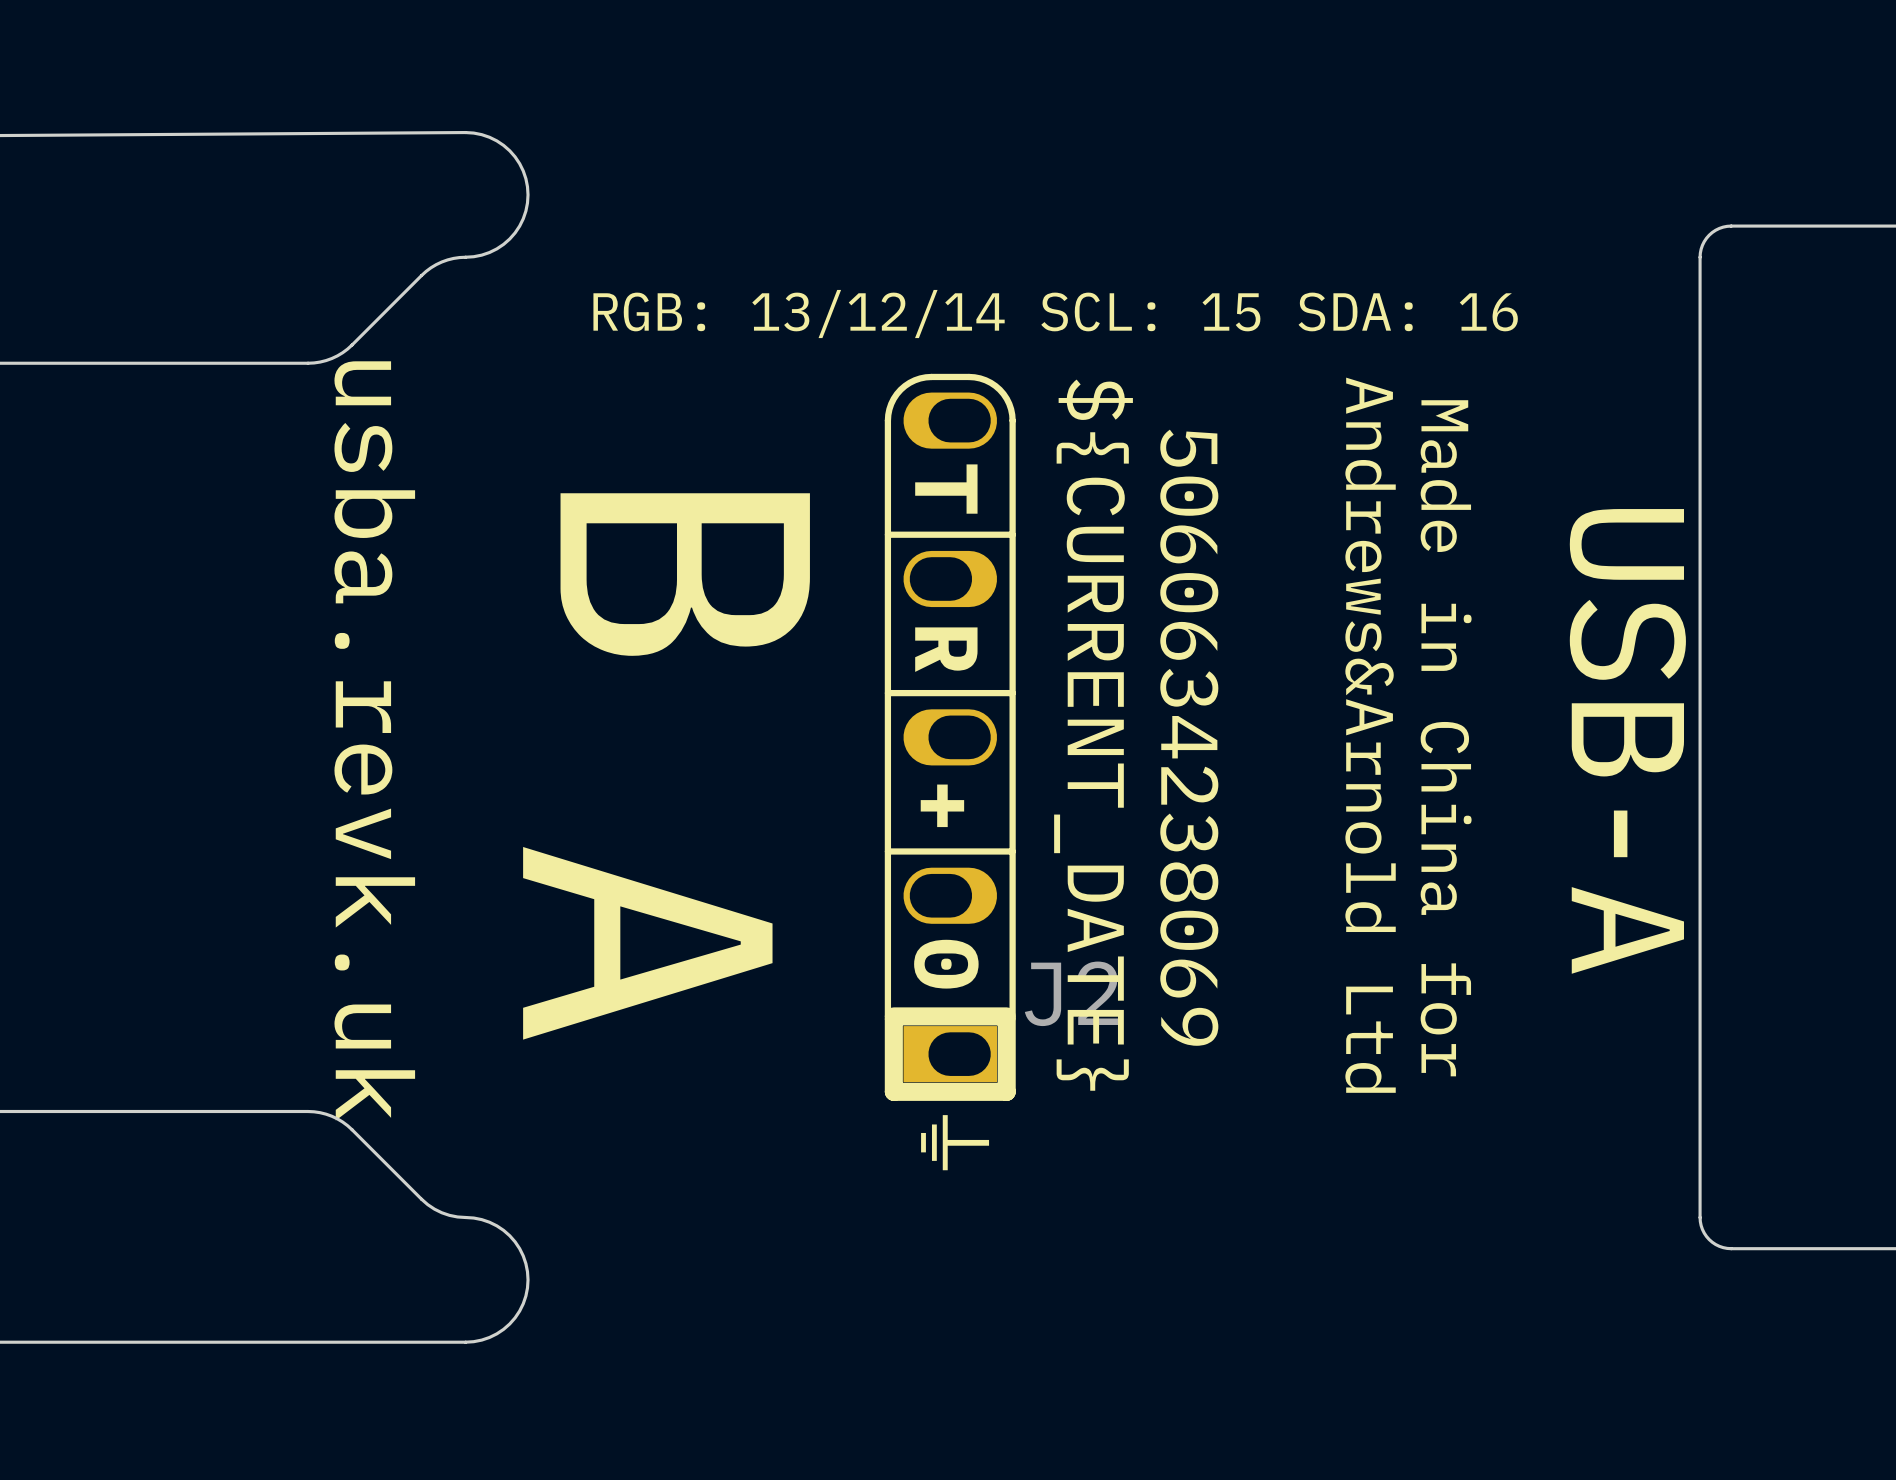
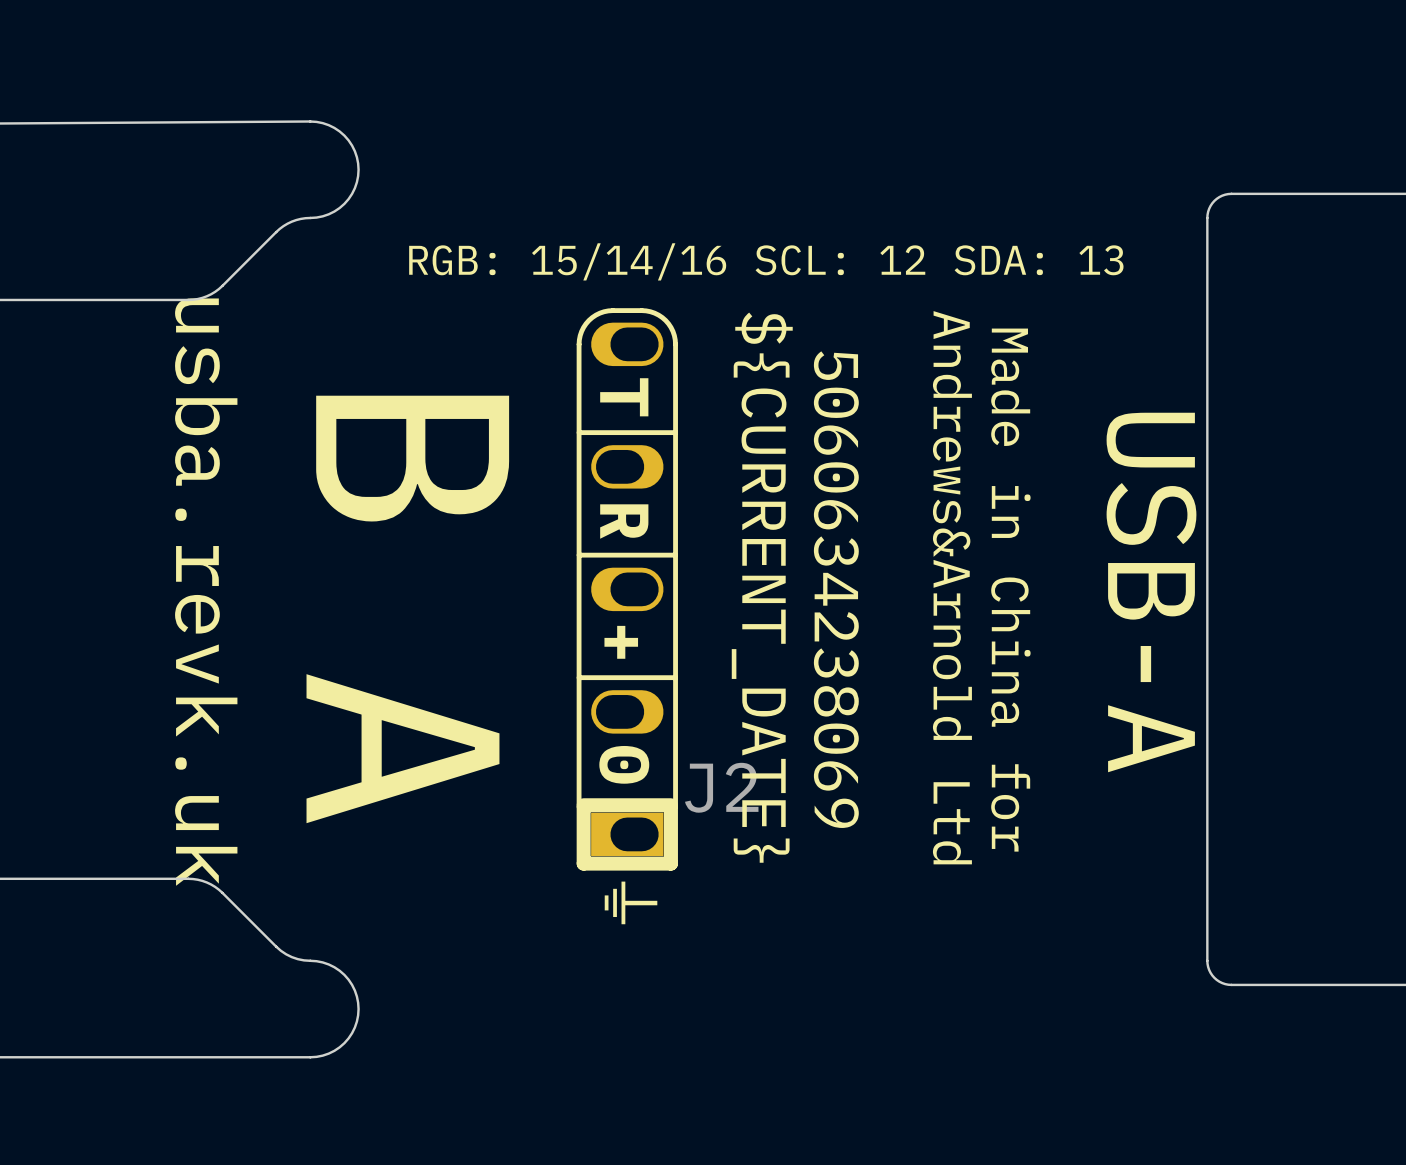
board edge: (1731, 226) (1719, 228) (1709, 235) (1702, 245) (1700, 257) (1700, 1217) (1702, 1229) (1709, 1239) (1719, 1246) (1731, 1248) -> (1289, 193) (1225, 194) (1212, 203) (1207, 217) (1207, 963) (1214, 977) (1225, 984) (1289, 984)
text: RGB: 13/12/14 SCL: 15 SDA: 16 (1055, 314) -> RGB: 15/14/16 SCL: 12 SDA: 13 (766, 261)
text position: B (685, 574) -> B (412, 458)
text position: ${CURRENT_DATE} (1093, 735) -> ${CURRENT_DATE} (762, 587)
text: none -> Andrews&Arnold Ltd (952, 587)
text: Andrews&Arnold Ltd (1370, 735) -> Made in China for (1010, 590)
J2 position: (950, 737) -> (627, 589)
text position: 5060634238069 (1189, 737) -> 5060634238069 (836, 589)
text: Made in China for (1446, 738) -> none
text position: usba.revk.uk (374, 740) -> usba.revk.uk (206, 592)
text position: USB-A (1627, 741) -> USB-A (1151, 592)
text position: A (647, 943) -> A (402, 748)

